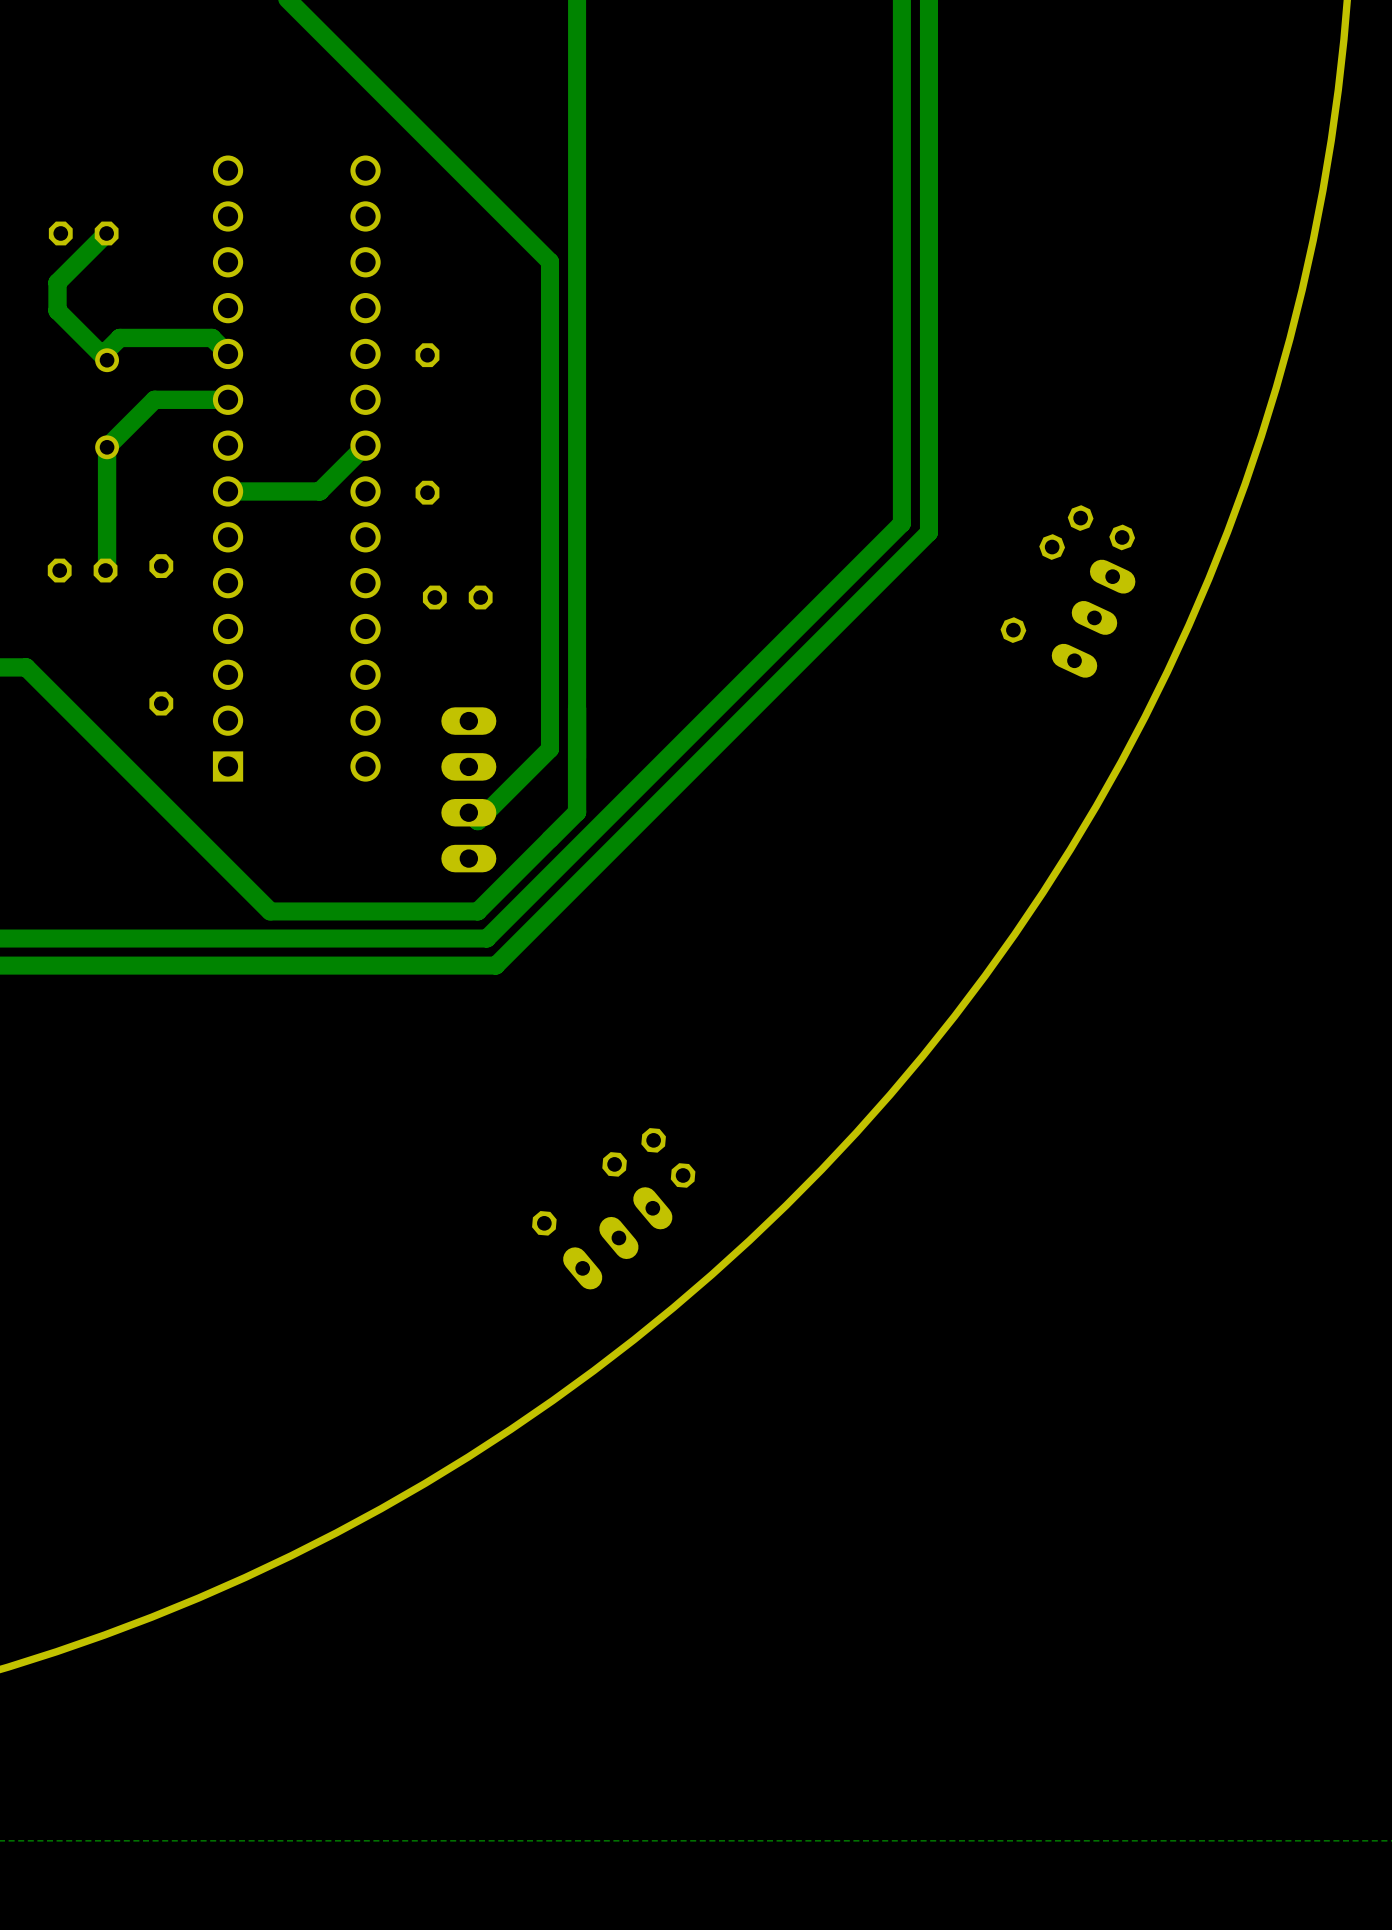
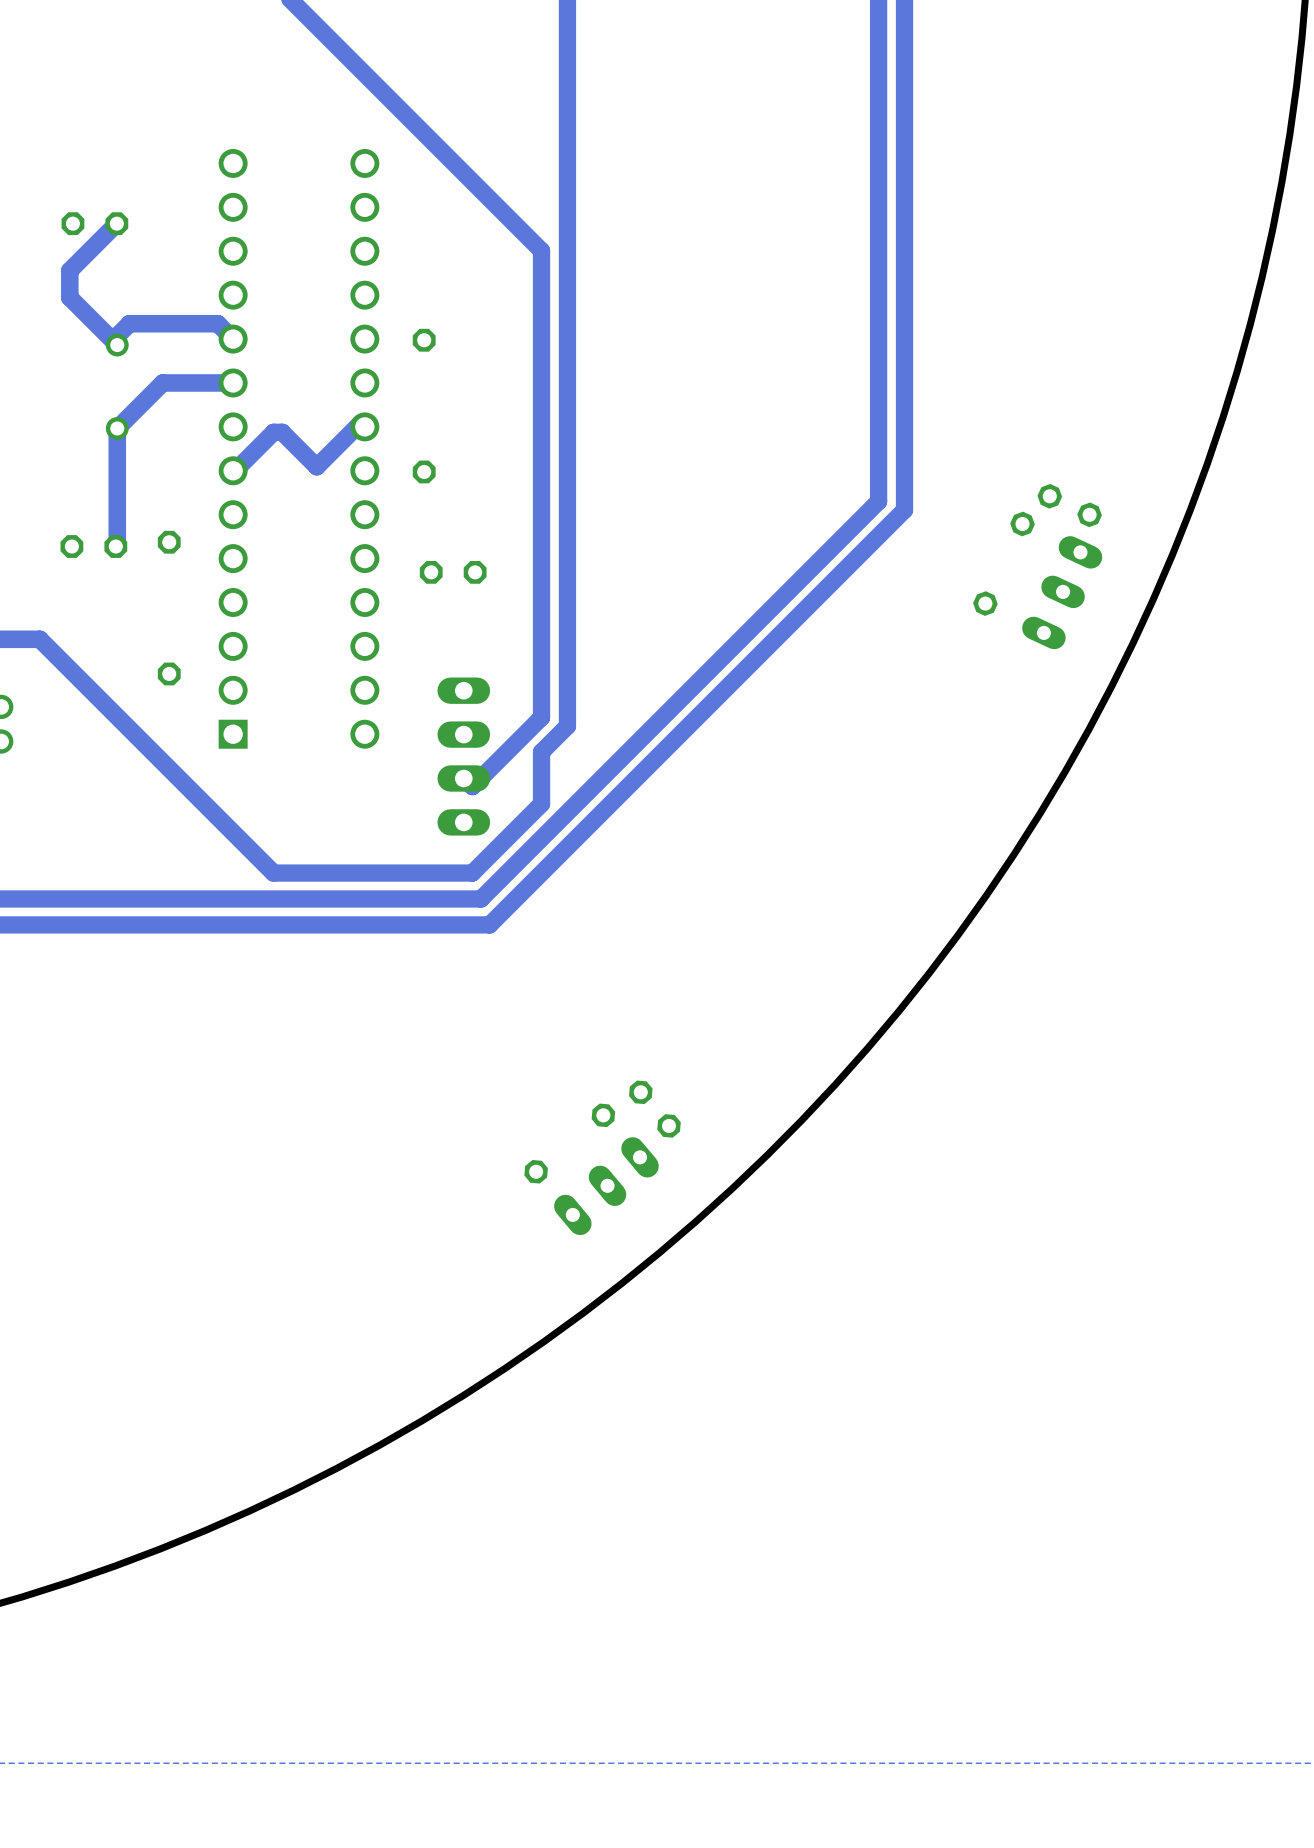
track: (365, 445) (319, 491) (228, 491) -> (364, 426) (360, 423) (316, 466) (282, 432) (273, 432) (233, 470)
track: (577, 708) (577, 812) (550, 839) -> (567, 726) (541, 752) (541, 803)

